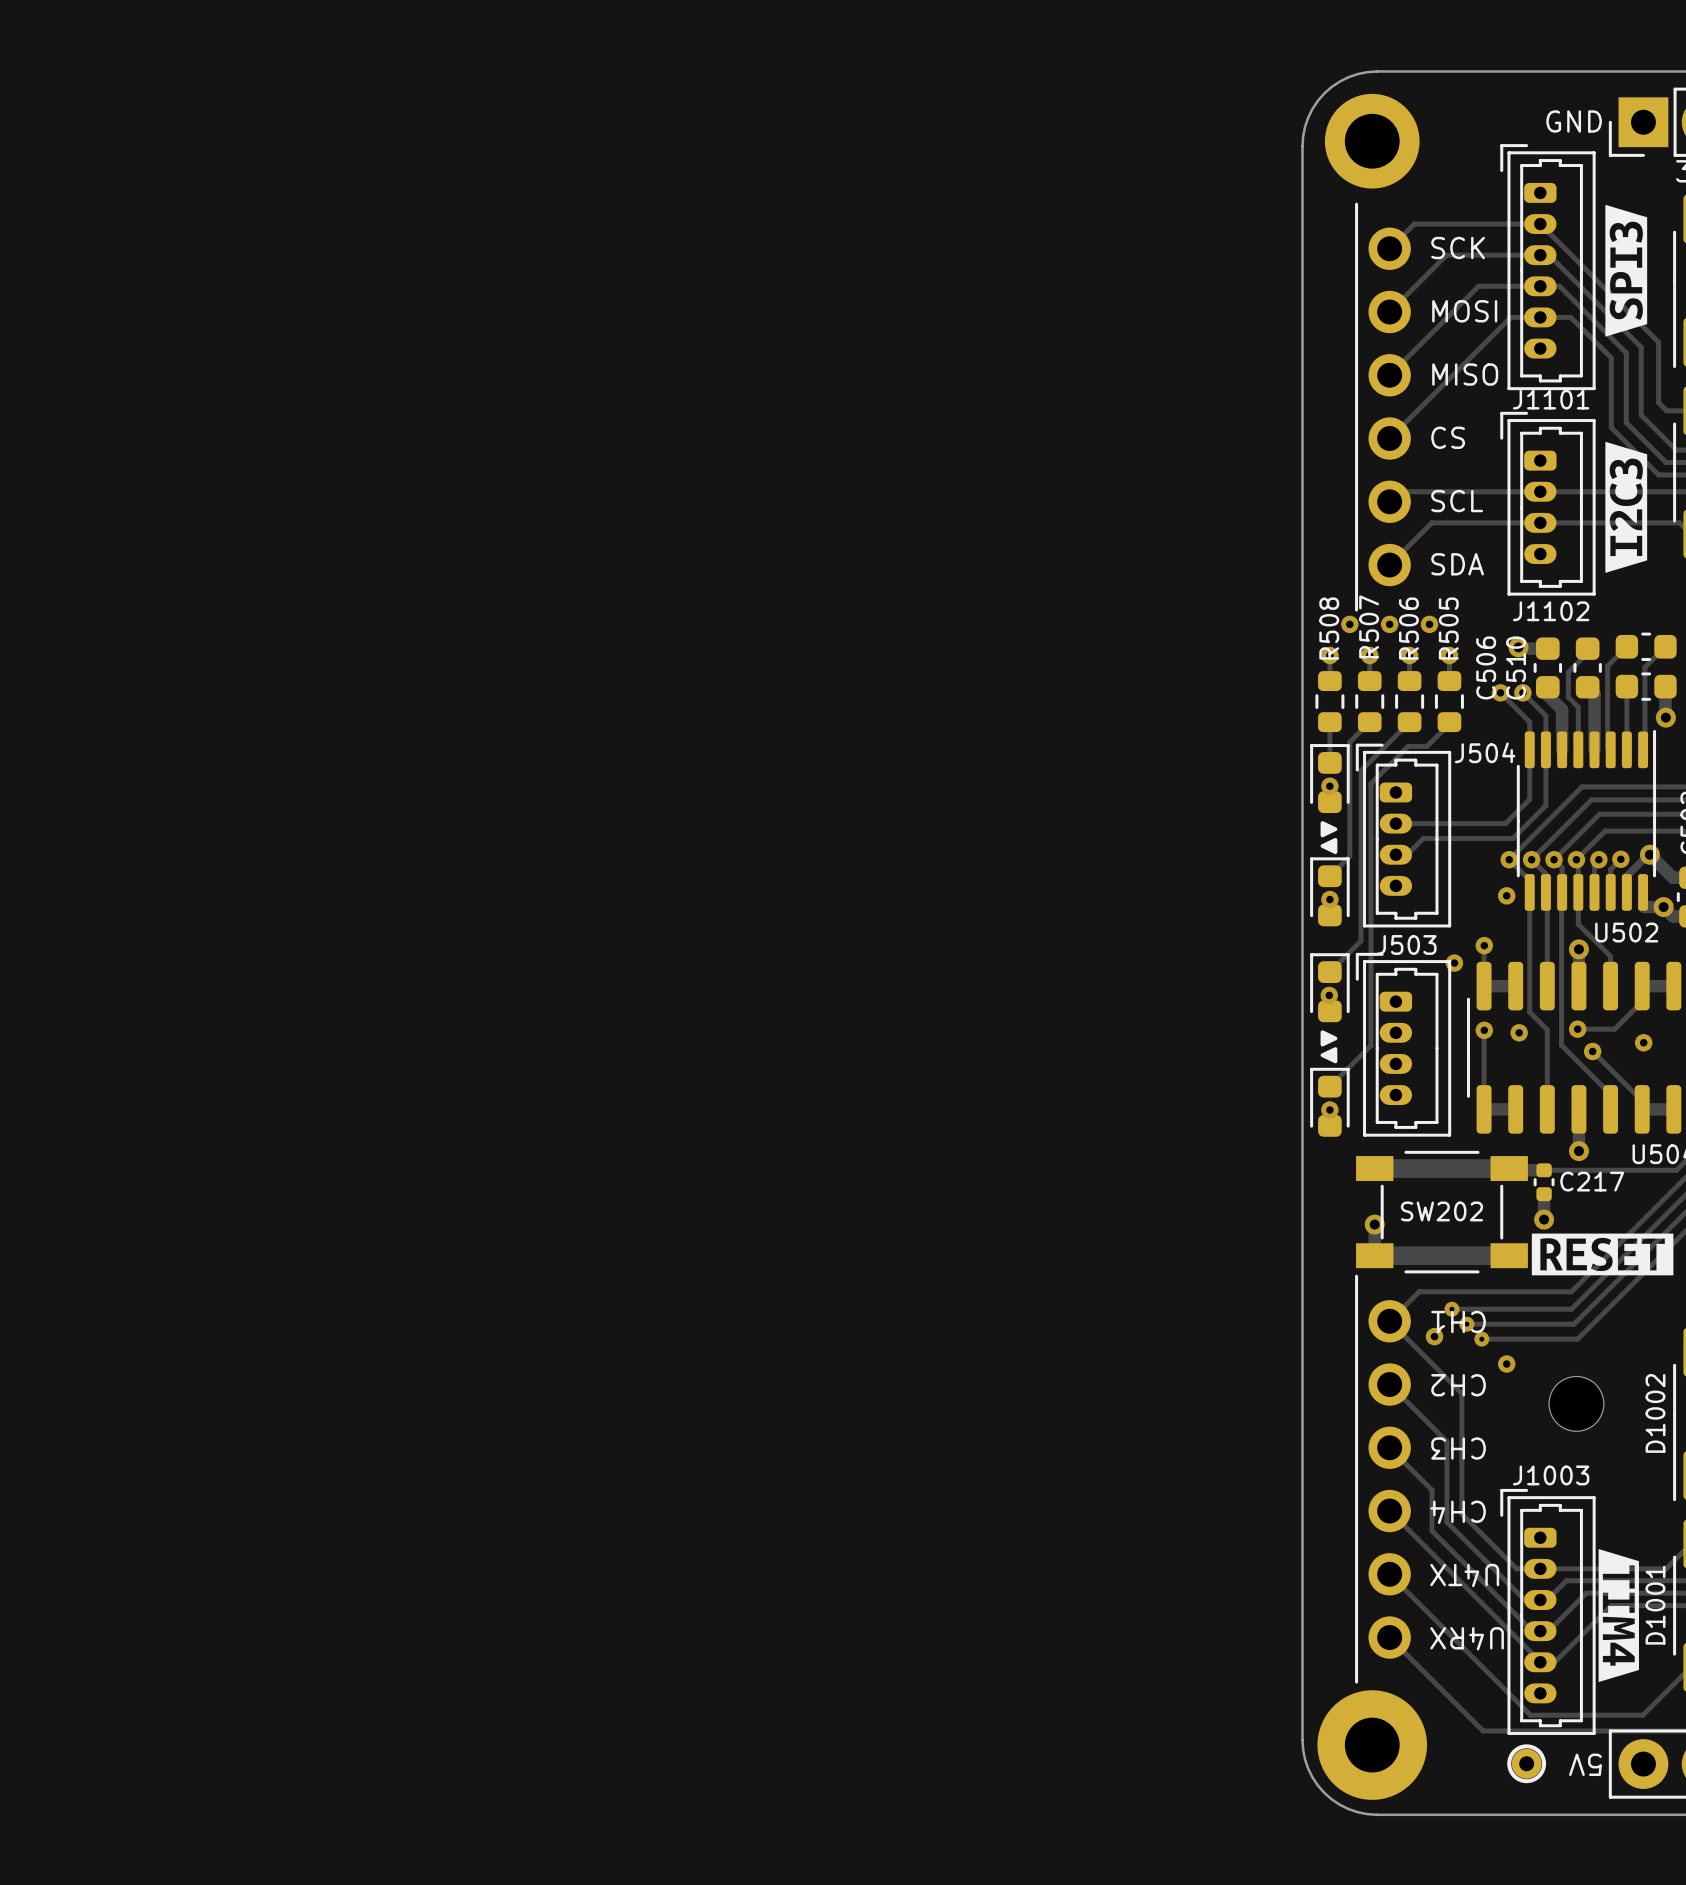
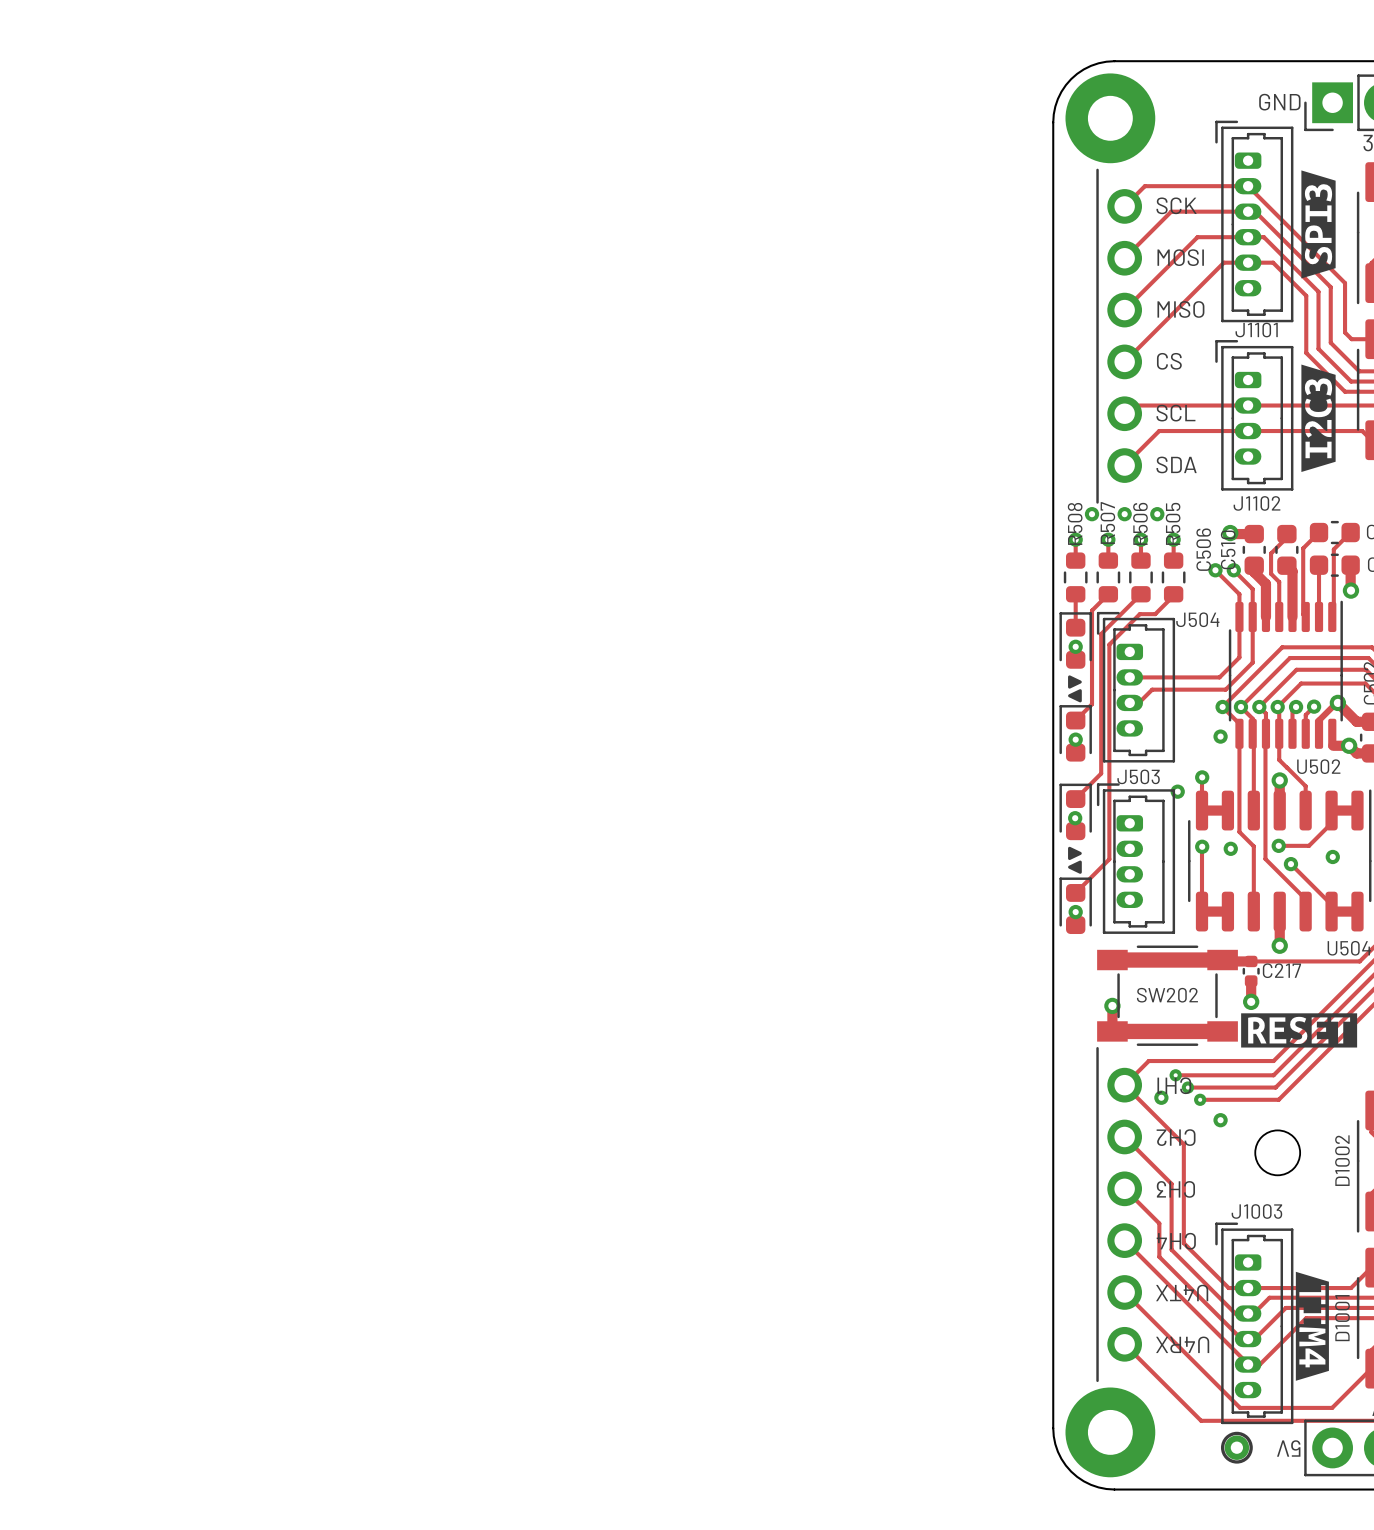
part footprint: [1324, 93, 1420, 189] -> [1065, 73, 1156, 164]

